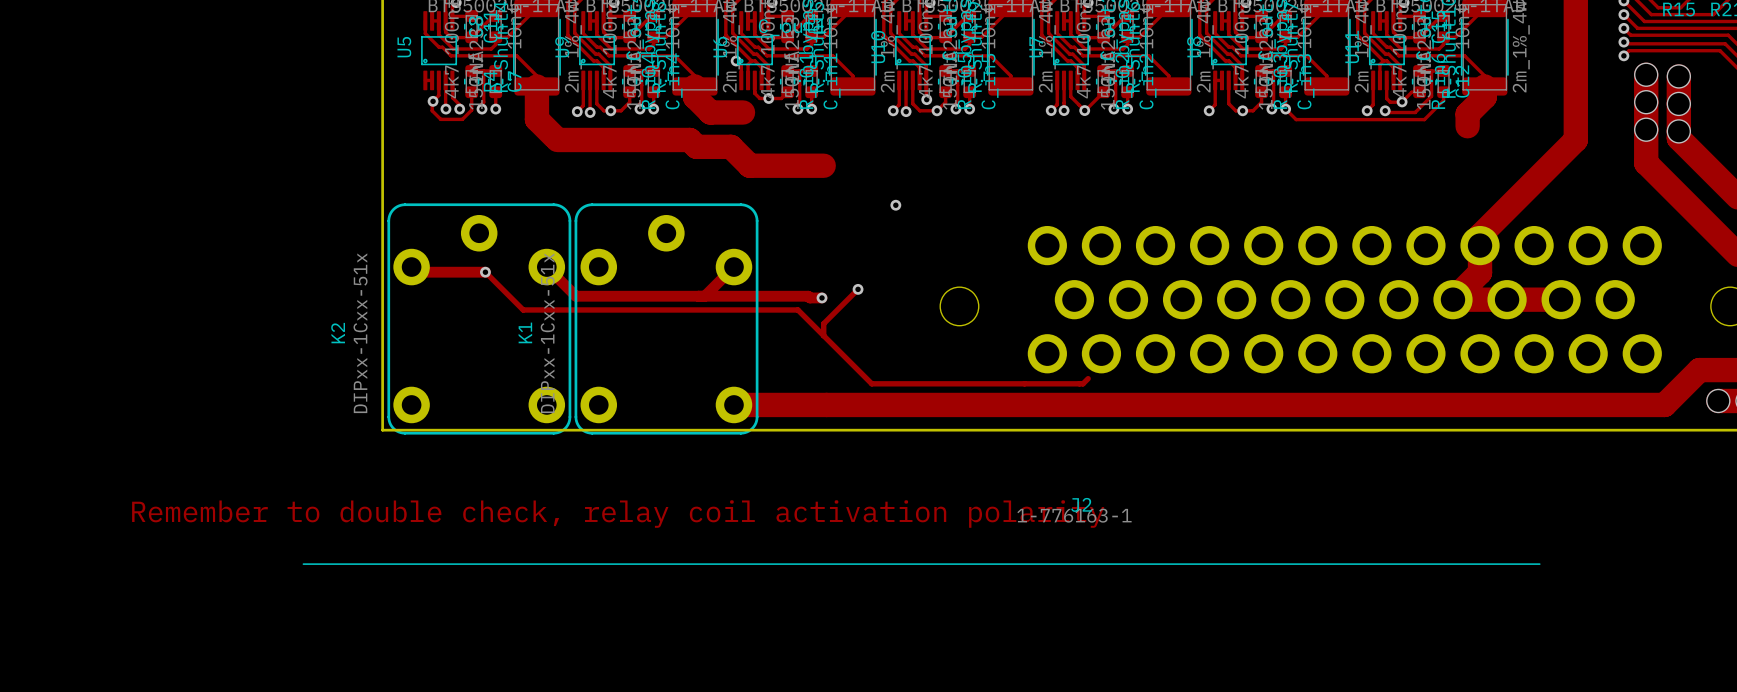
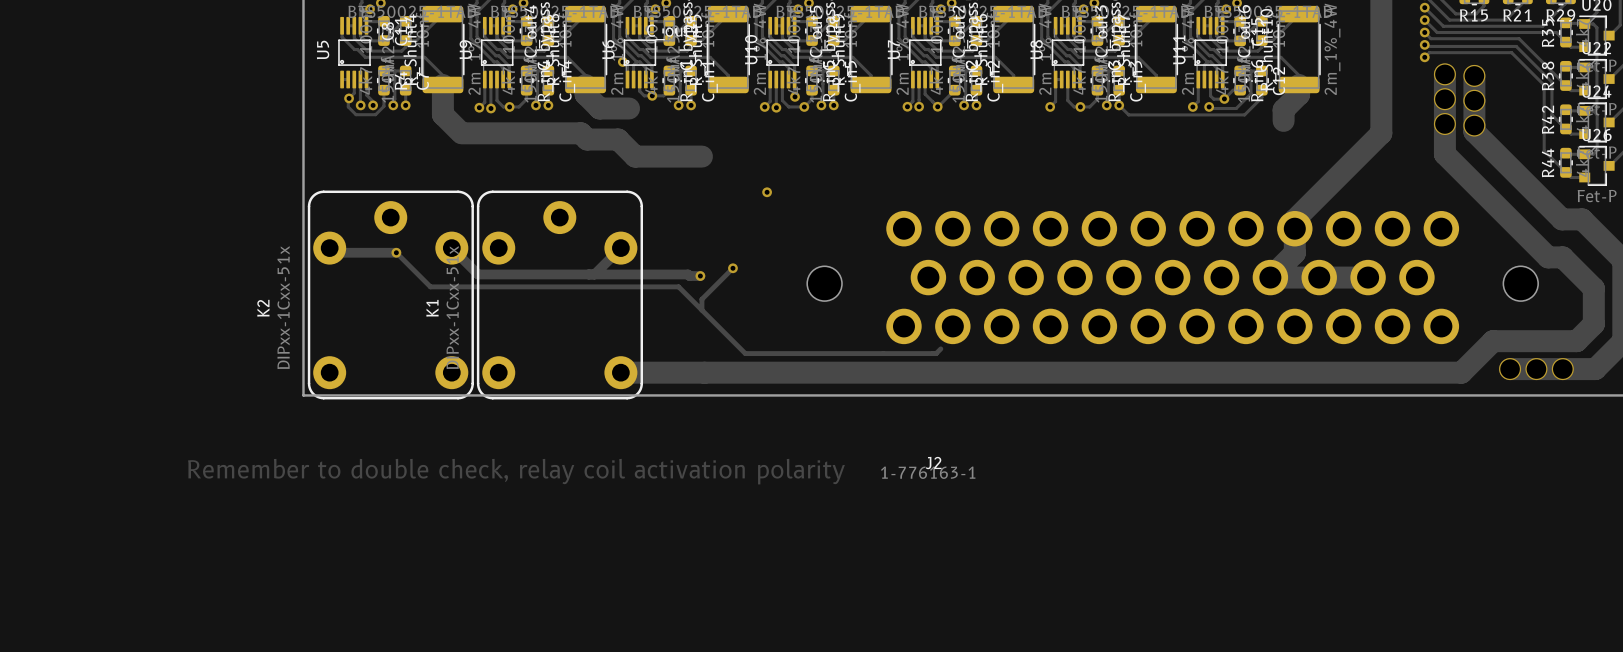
line: (303, 564) (1539, 564) -> none

